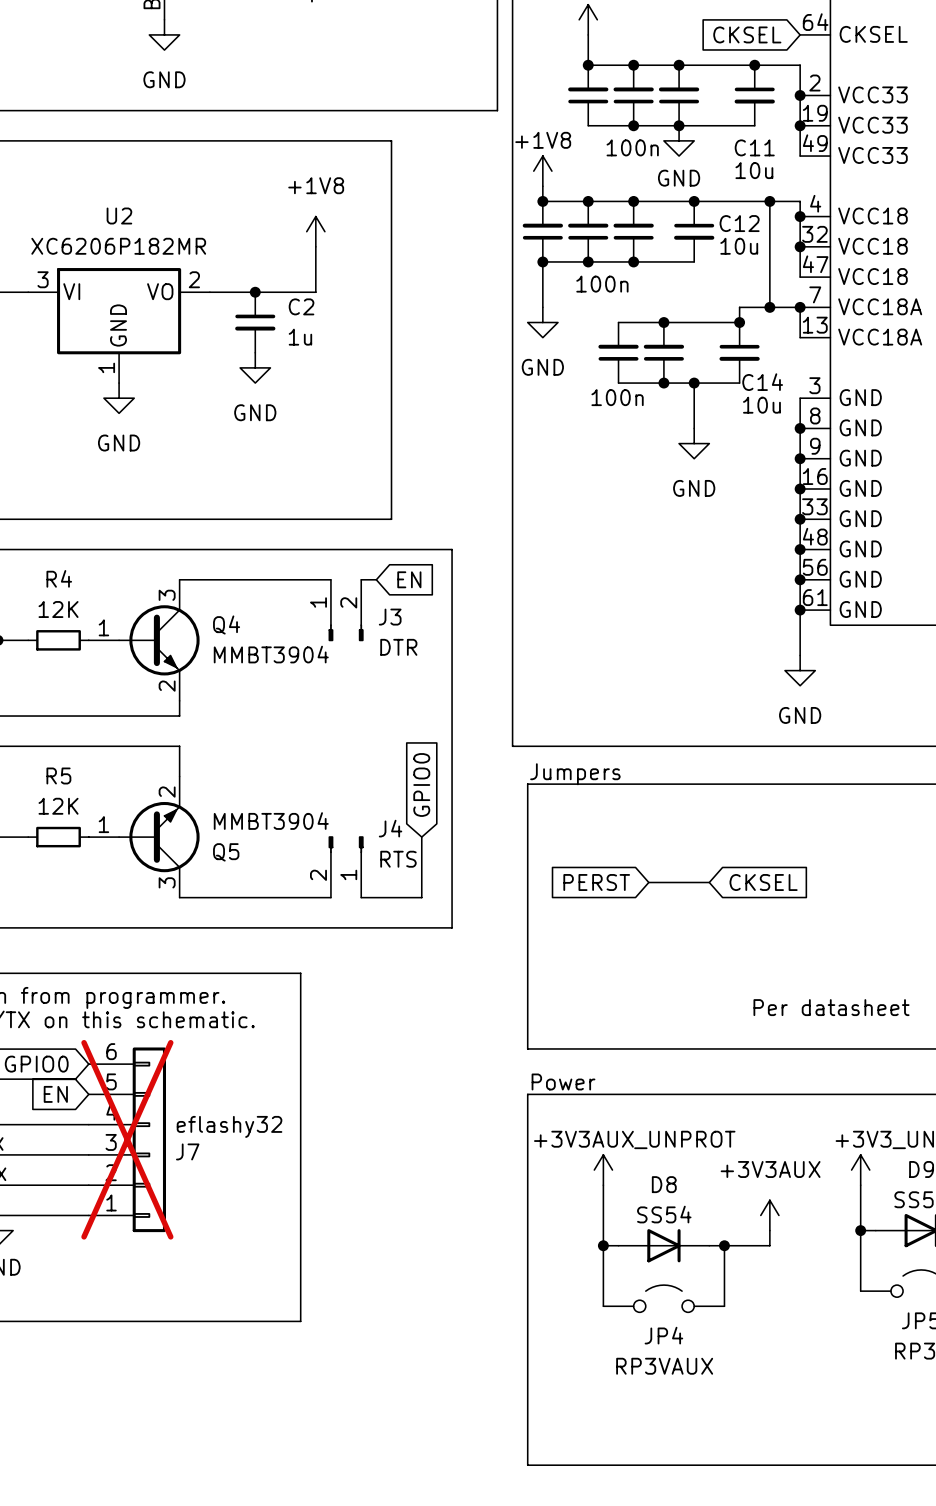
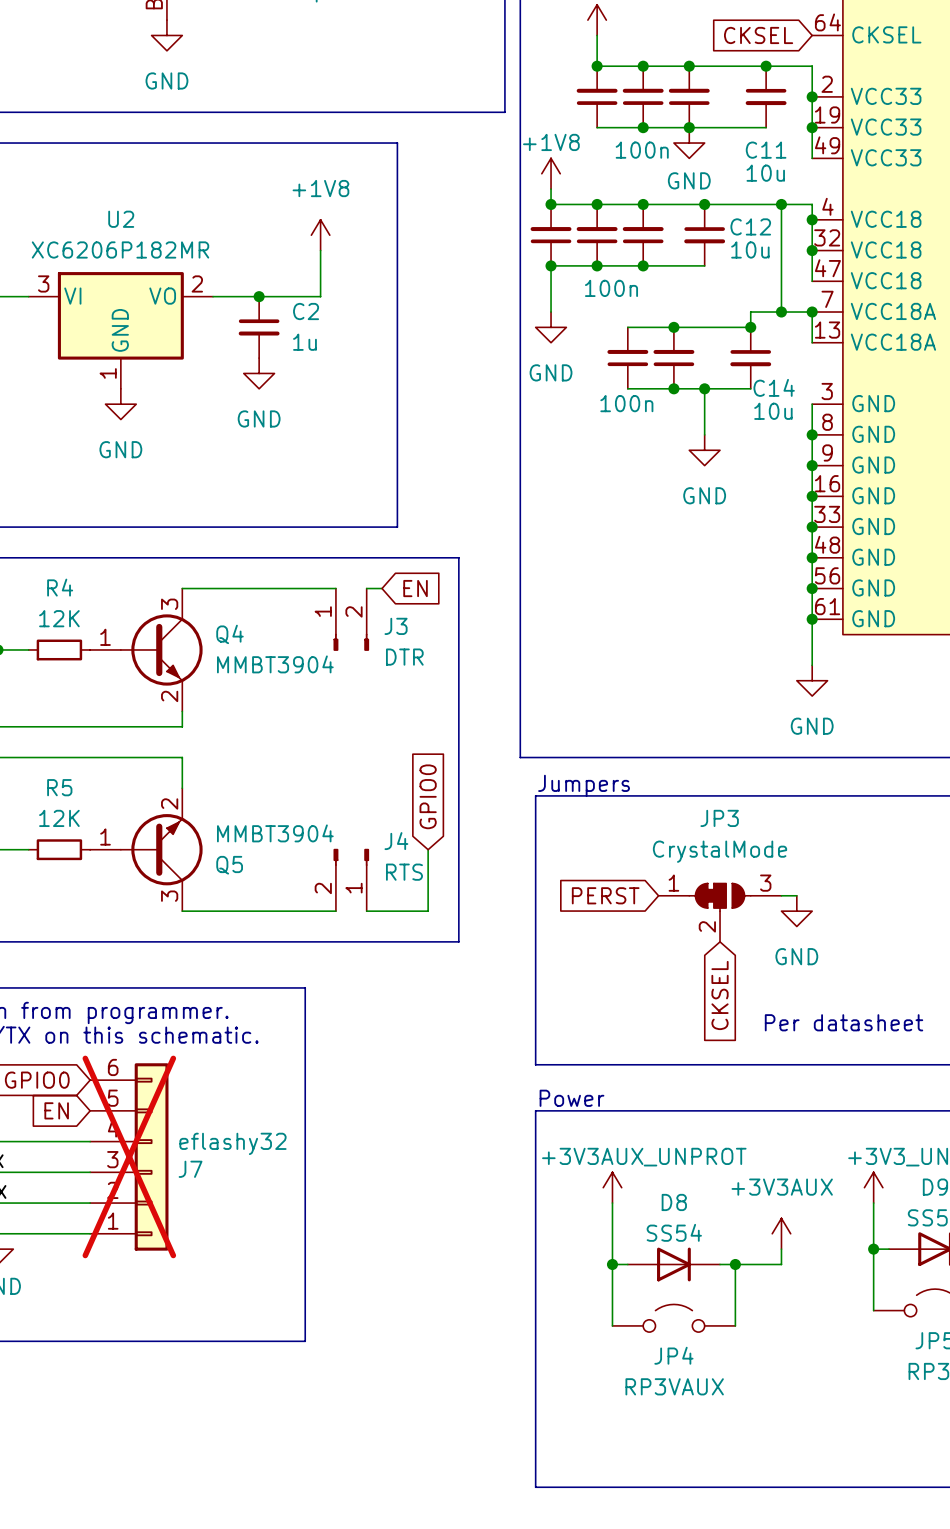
global label rotation: 0° (763, 882) -> 90° clockwise (720, 995)
global label position: CKSEL (763, 882) -> CKSEL (720, 995)
wire: none -> (781, 895) (796, 895)
power symbol: none -> GND (796, 911)
JP3: none -> CrystalMode (720, 912)

